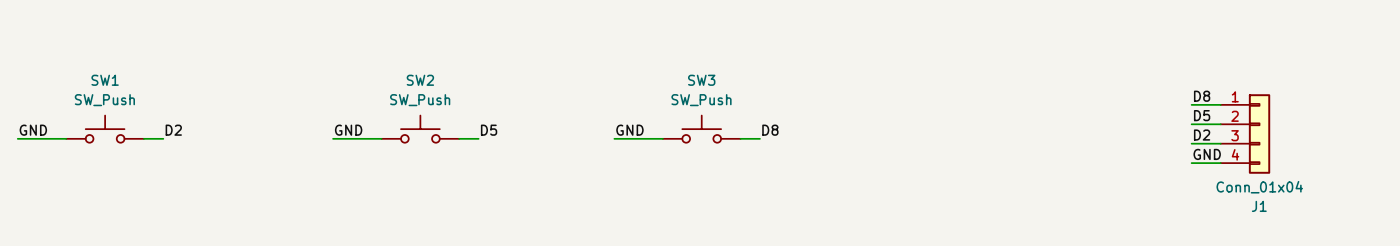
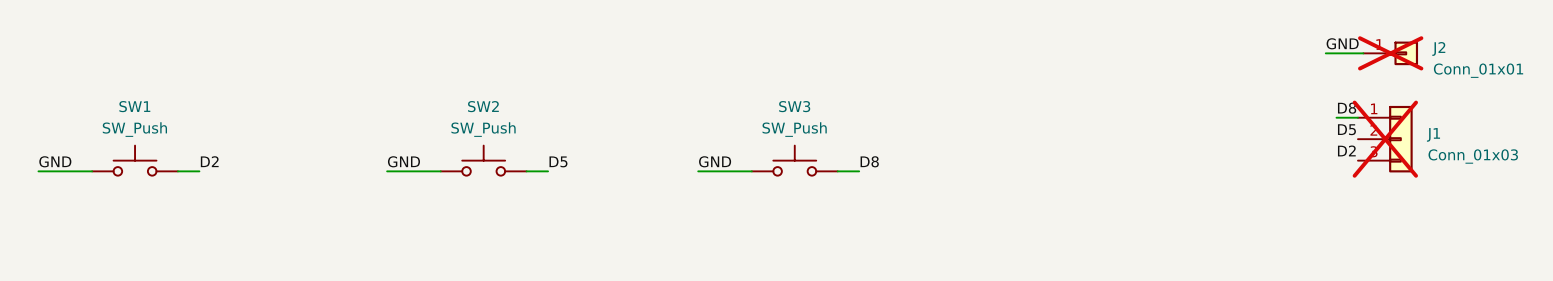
wire: none -> (1325, 53) (1363, 53)
J2: none -> Conn_01x01 (1390, 53)
wire: none -> (1336, 117) (1357, 117)
J1 symbol: [1220, 94, 1271, 174] -> [1357, 105, 1413, 173]
label position: D8 (1202, 96) -> D8 (1347, 108)
wire: (1191, 104) (1220, 104) -> none
J1 do-not-place cross: none -> (1385, 139)
label position: D5 (1202, 115) -> D5 (1346, 129)
wire: (1191, 124) (1220, 124) -> none
label position: D2 (1202, 135) -> D2 (1346, 150)
wire: (1191, 143) (1220, 143) -> none
label position: GND (1207, 154) -> GND (1342, 43)
wire: (1191, 163) (1220, 163) -> none
J1 value: Conn_01x04 (1259, 187) -> Conn_01x03 (1473, 156)
J1 name position: J1 (1259, 206) -> J1 (1433, 134)

